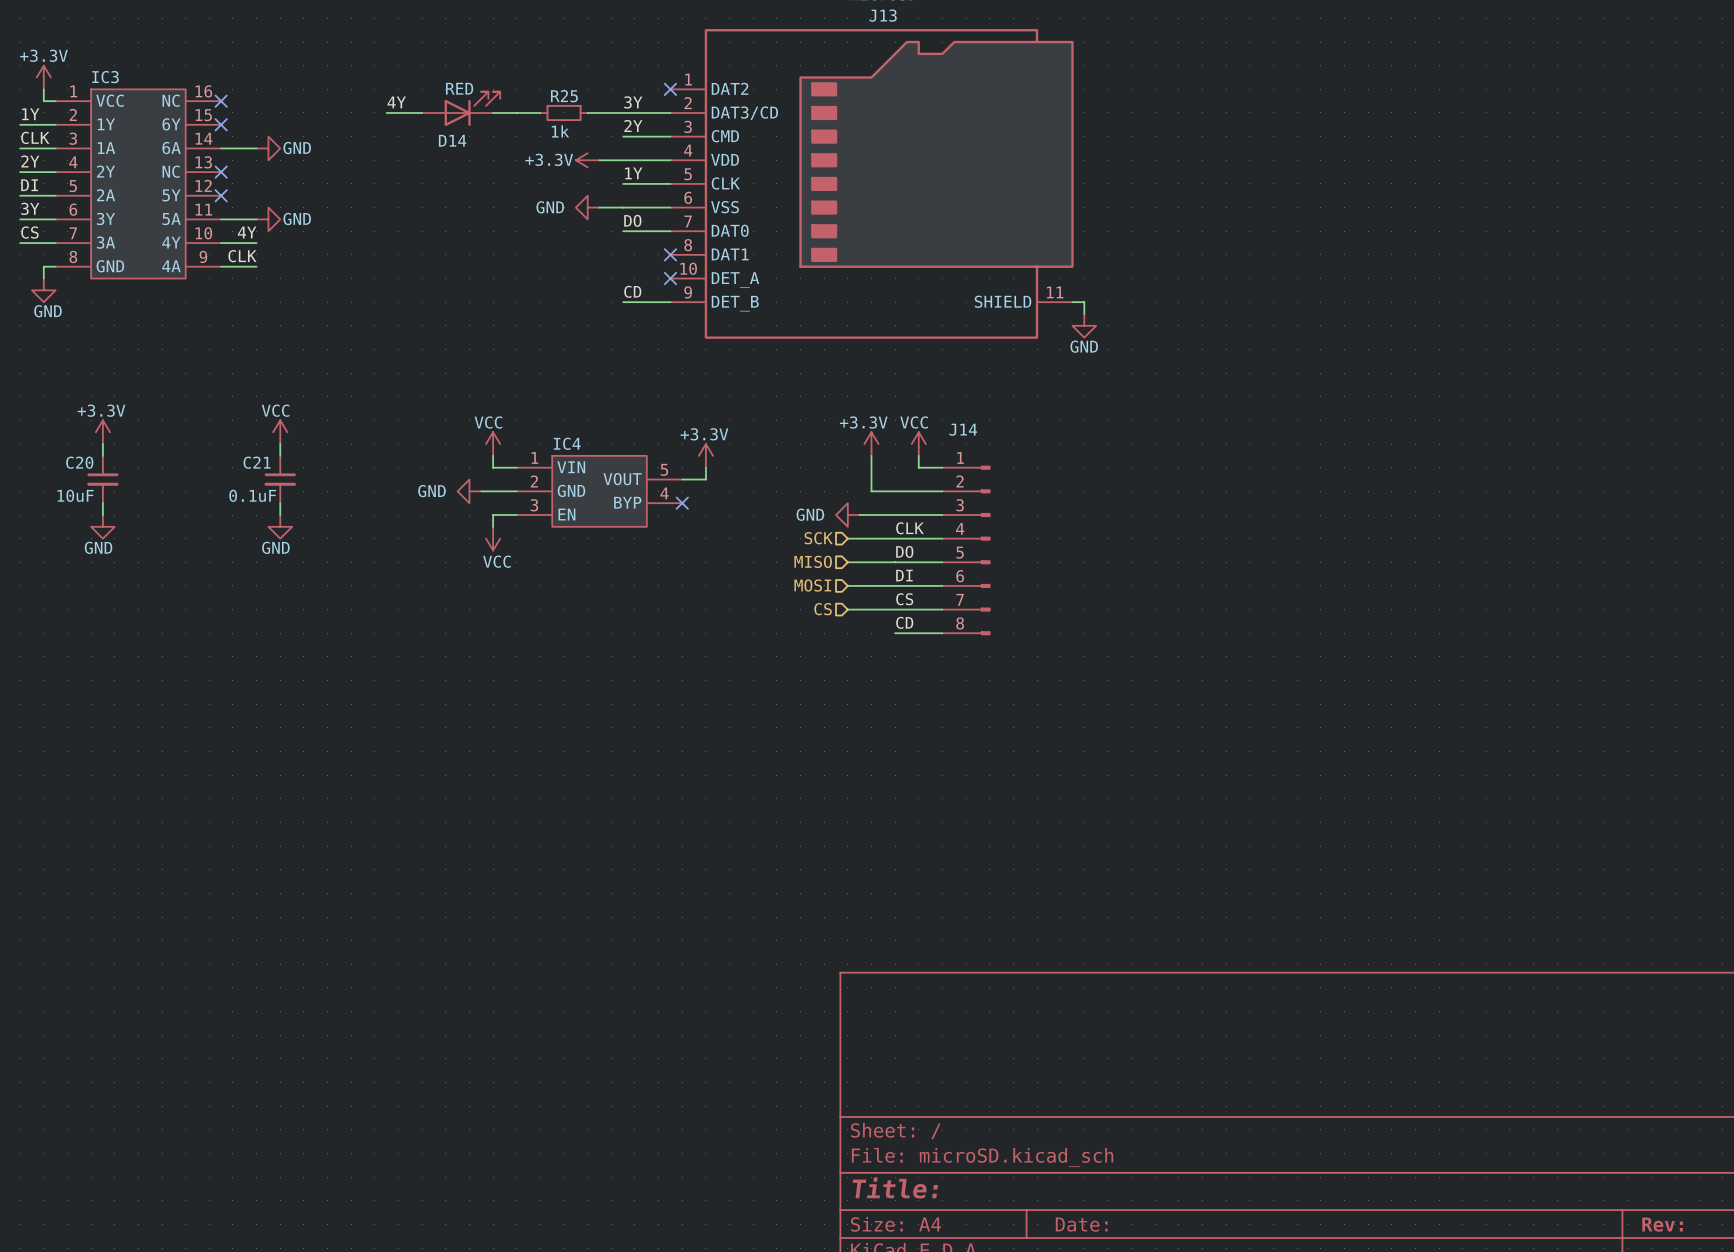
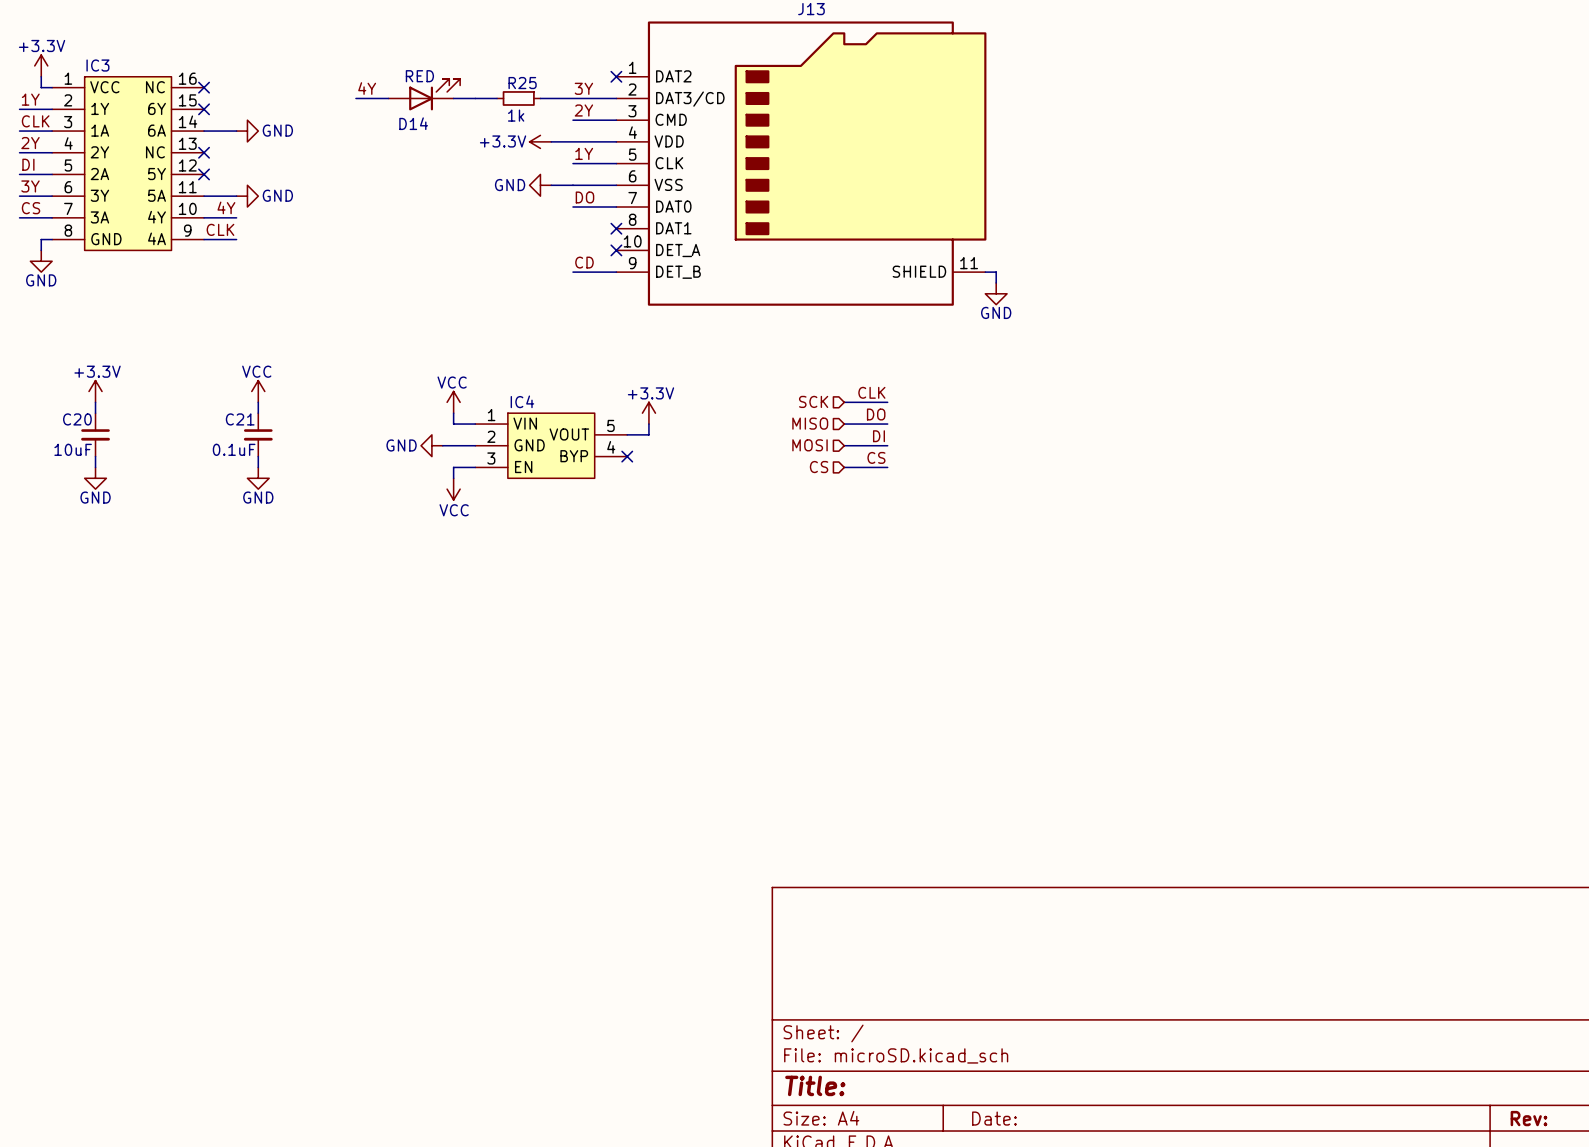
power symbol: +3.3V (871, 444) -> none
power symbol: VCC (918, 444) -> none
wire: (871, 455) (871, 491) (918, 491) -> none
wire: (918, 455) (918, 467) -> none
power symbol: GND (847, 515) -> none
wire: (859, 515) (918, 515) -> none
label position: CLK (909, 528) -> CLK (871, 392)
hierarchical label position: SCK (818, 538) -> SCK (813, 401)
wire: (847, 538) (942, 538) -> none
J14: (966, 550) -> none
label position: DO (904, 551) -> DO (876, 414)
hierarchical label position: MISO (813, 561) -> MISO (810, 423)
wire: (847, 562) (942, 562) -> none
label position: DI (904, 575) -> DI (878, 436)
hierarchical label position: MOSI (812, 585) -> MOSI (810, 445)
wire: (847, 585) (942, 585) -> none
label position: CS (904, 599) -> CS (876, 457)
hierarchical label position: CS (823, 609) -> CS (819, 467)
wire: (847, 609) (942, 609) -> none
label: CD (904, 622) -> none
wire: (895, 633) (942, 633) -> (844, 402) (887, 402)

